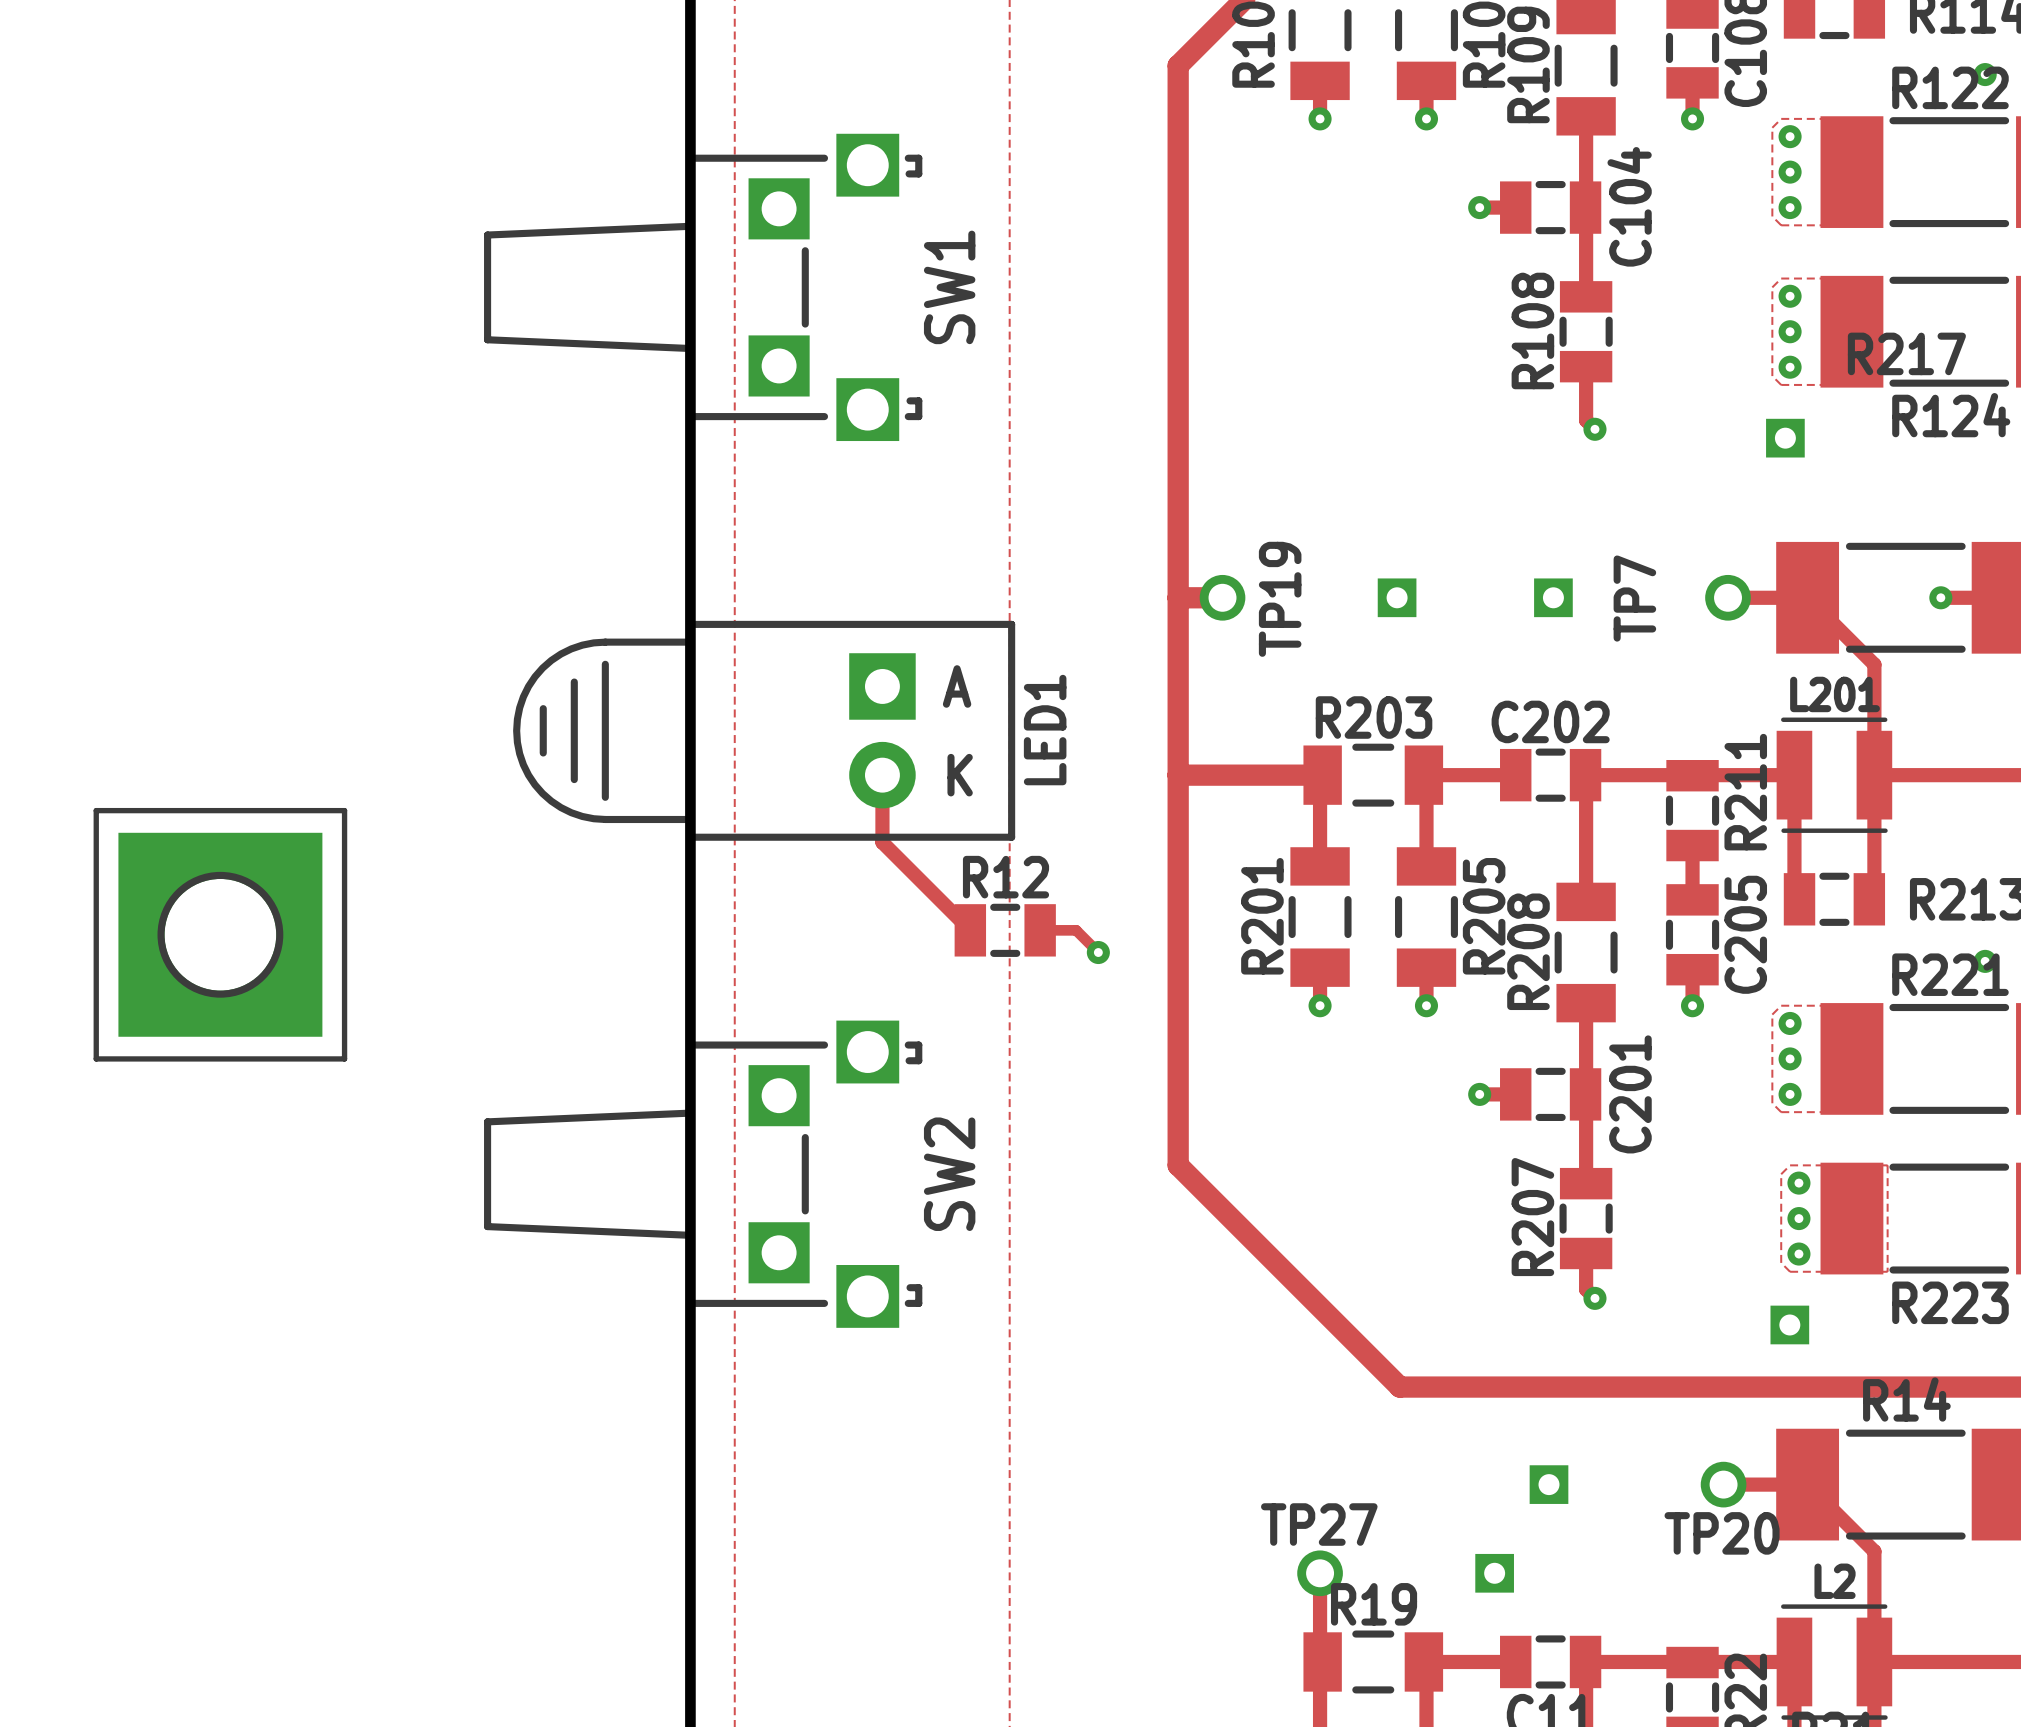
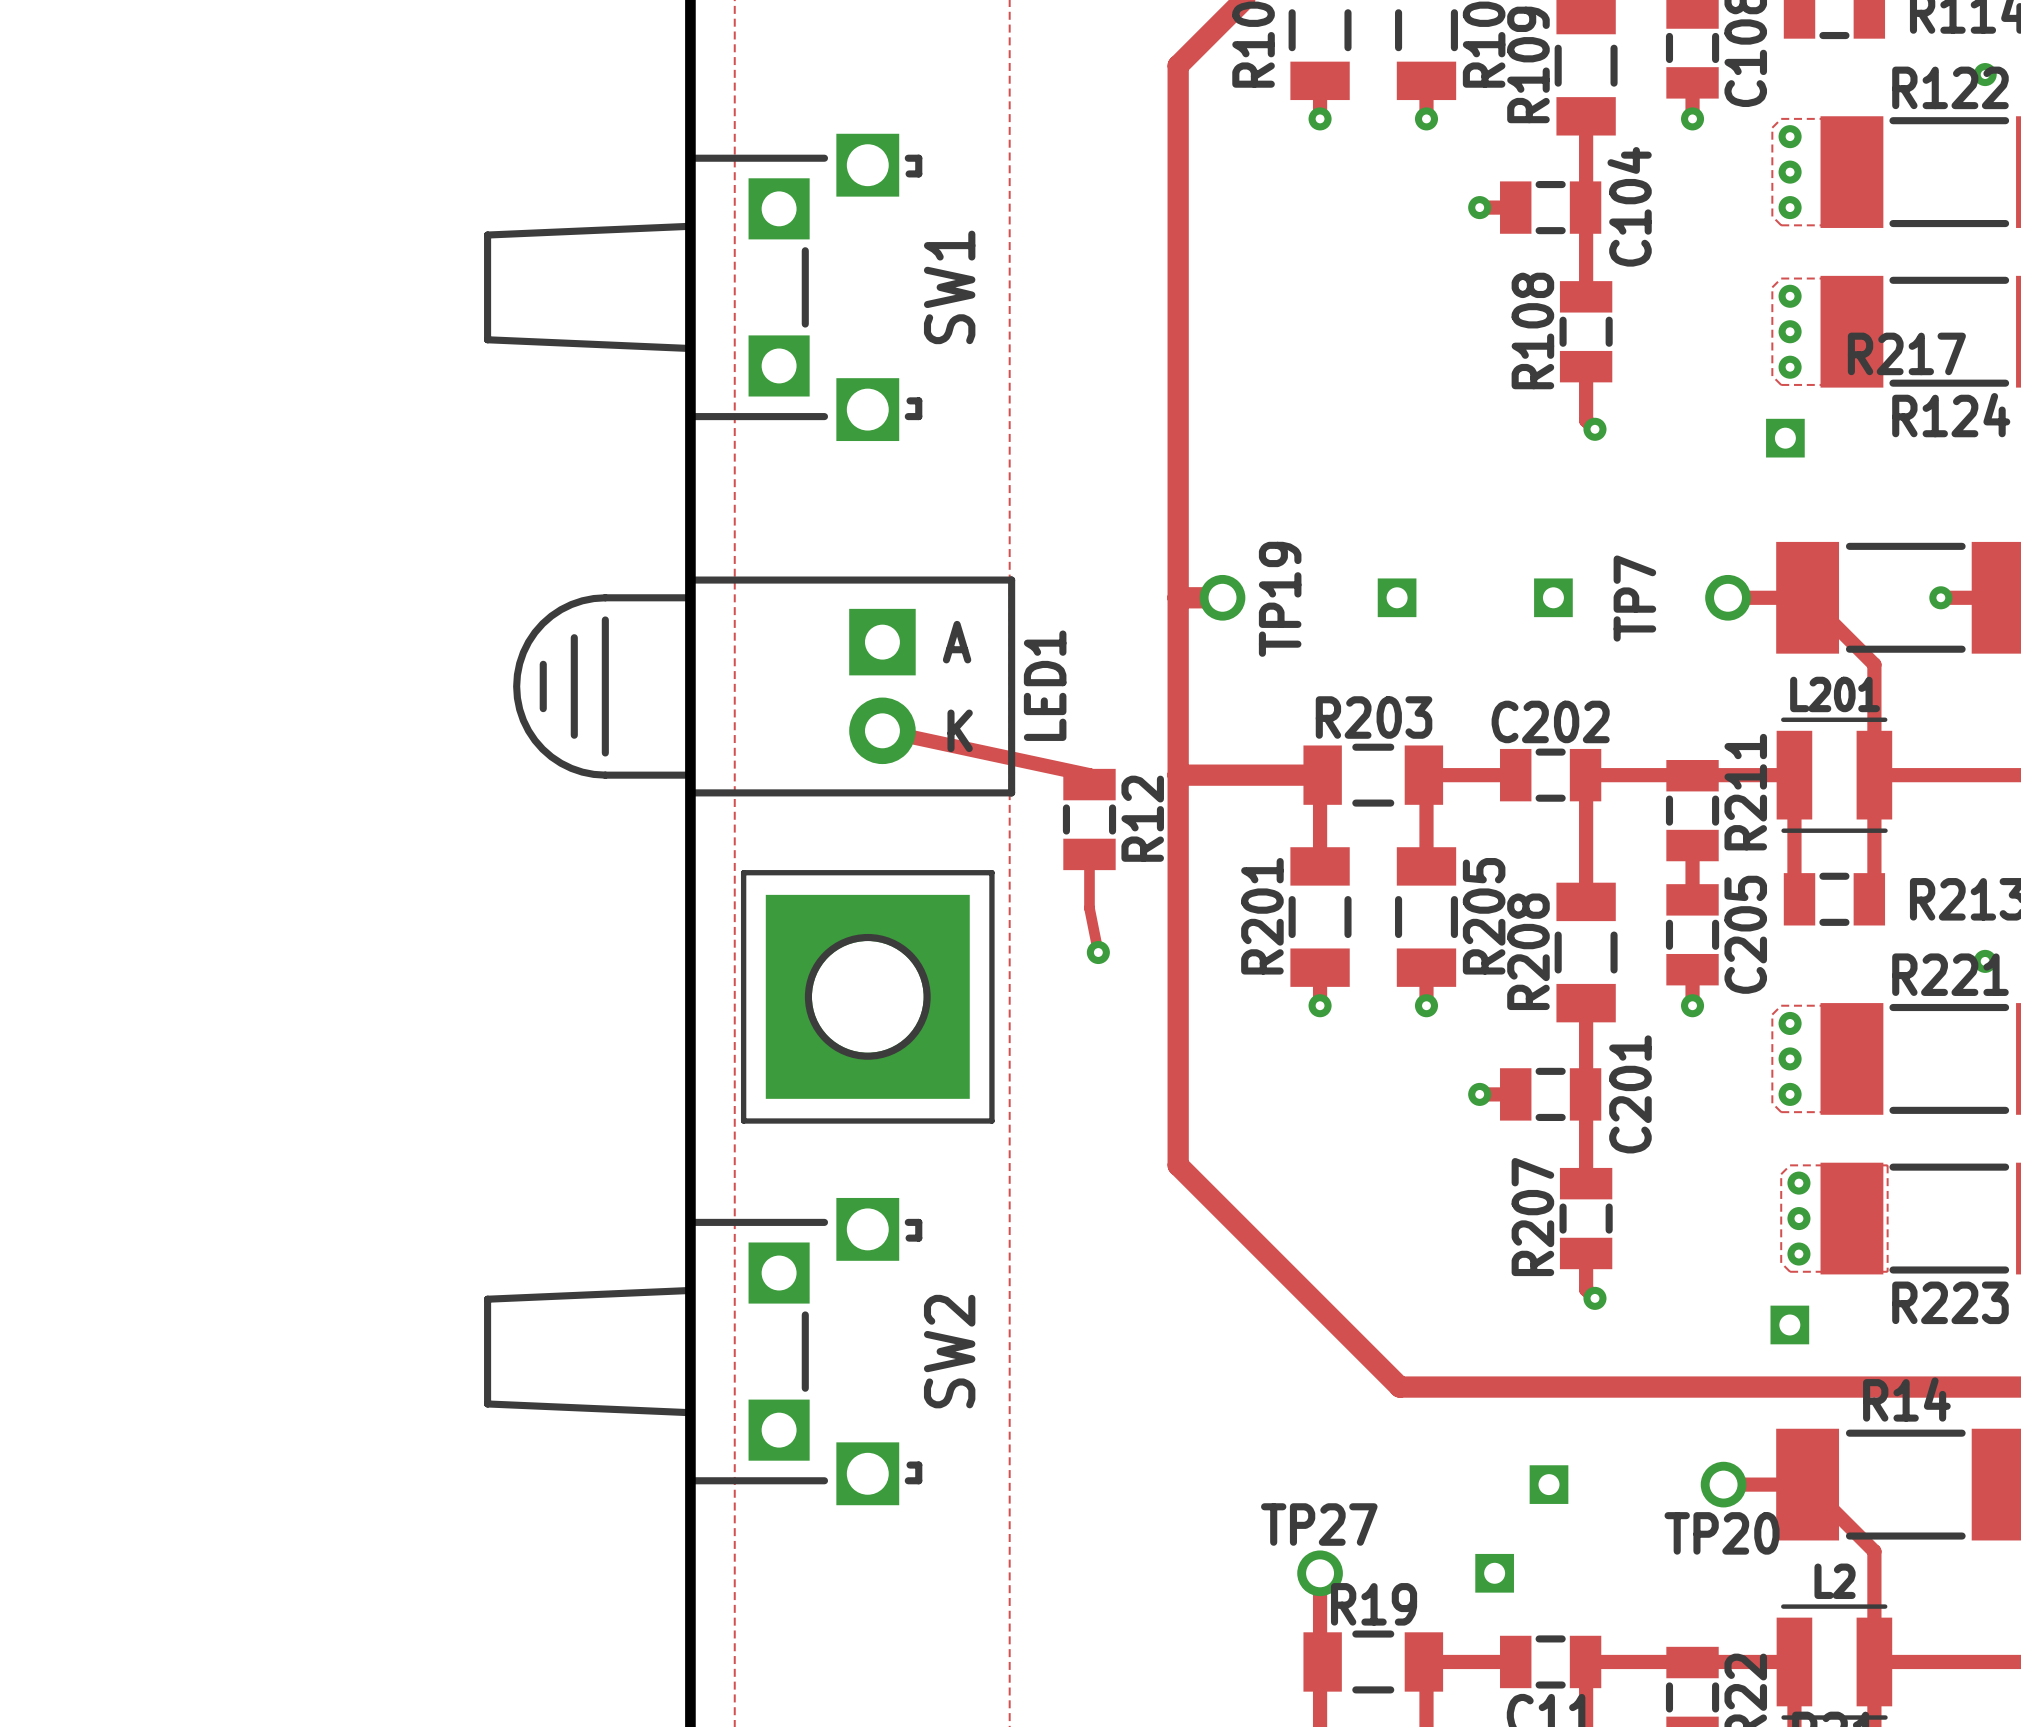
LED1 position: (764, 730) -> (764, 686)
track: none -> (882, 730) (1089, 775) (1089, 784)
track: (882, 775) (882, 842) (970, 930) -> none
R12 rotation: 0° (1005, 930) -> 90° clockwise (1089, 819)
R12 position: (1005, 930) -> (1089, 819)
track: (1040, 930) (1076, 930) (1098, 952) -> (1089, 854) (1089, 908) (1098, 952)
part position: (220, 934) -> (867, 996)
SW2 position: (703, 1174) -> (703, 1351)

